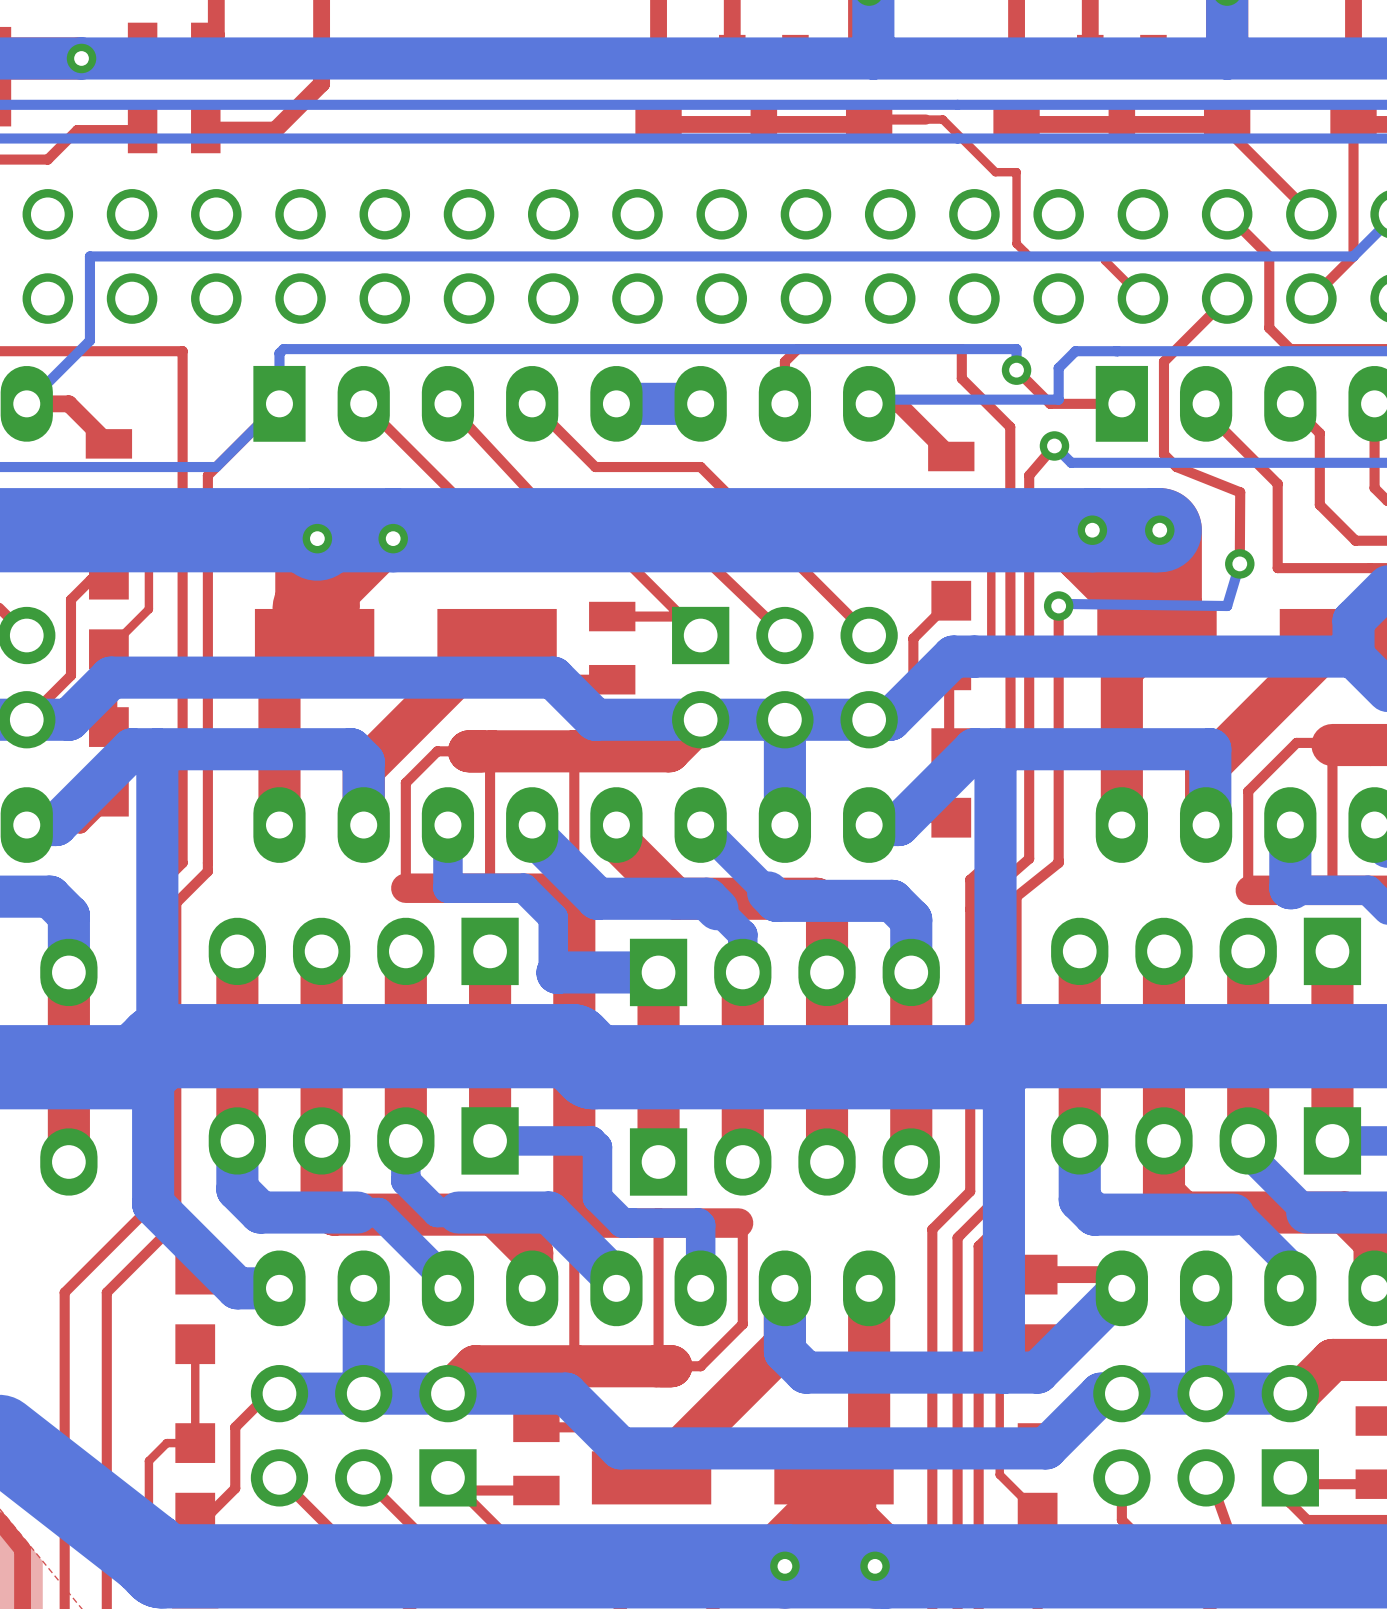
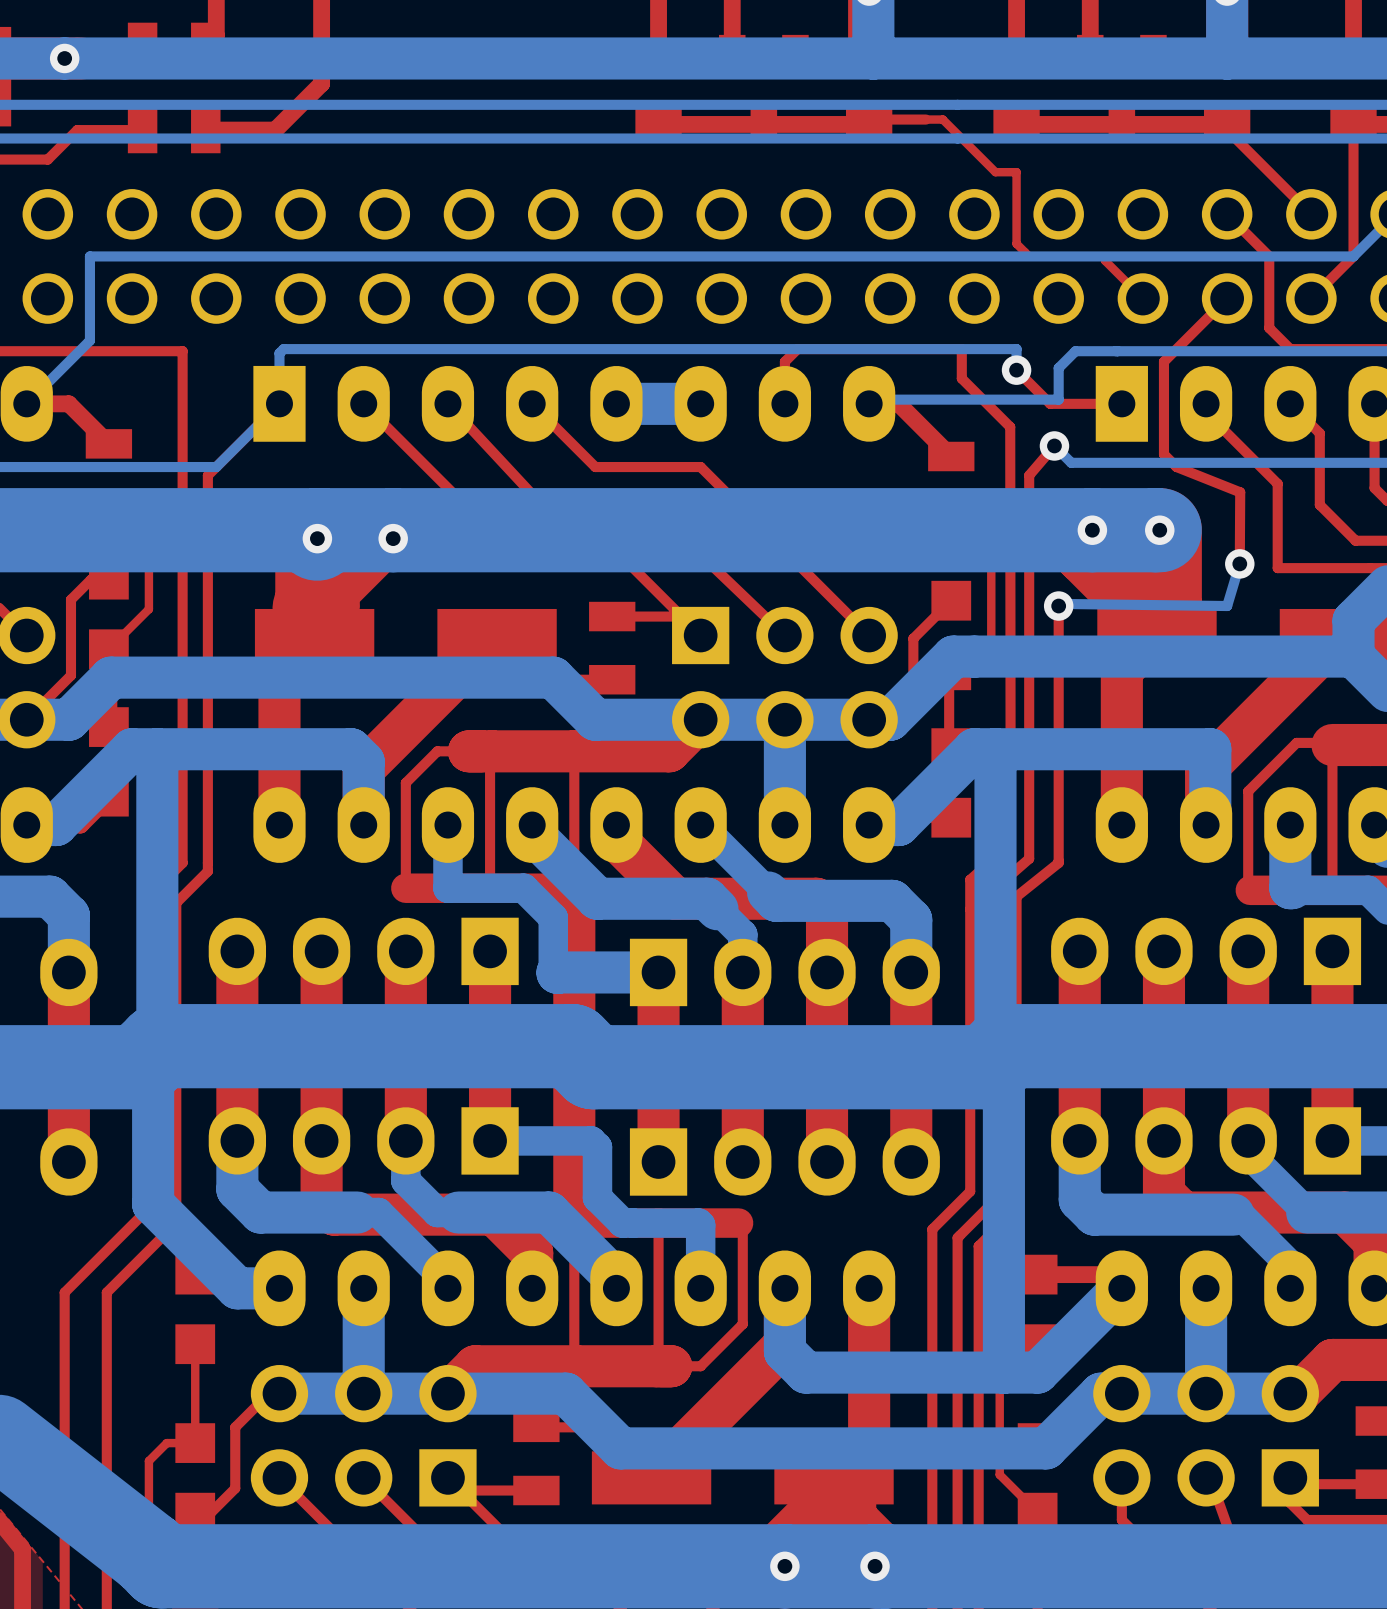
via position: (81, 58) -> (64, 58)

